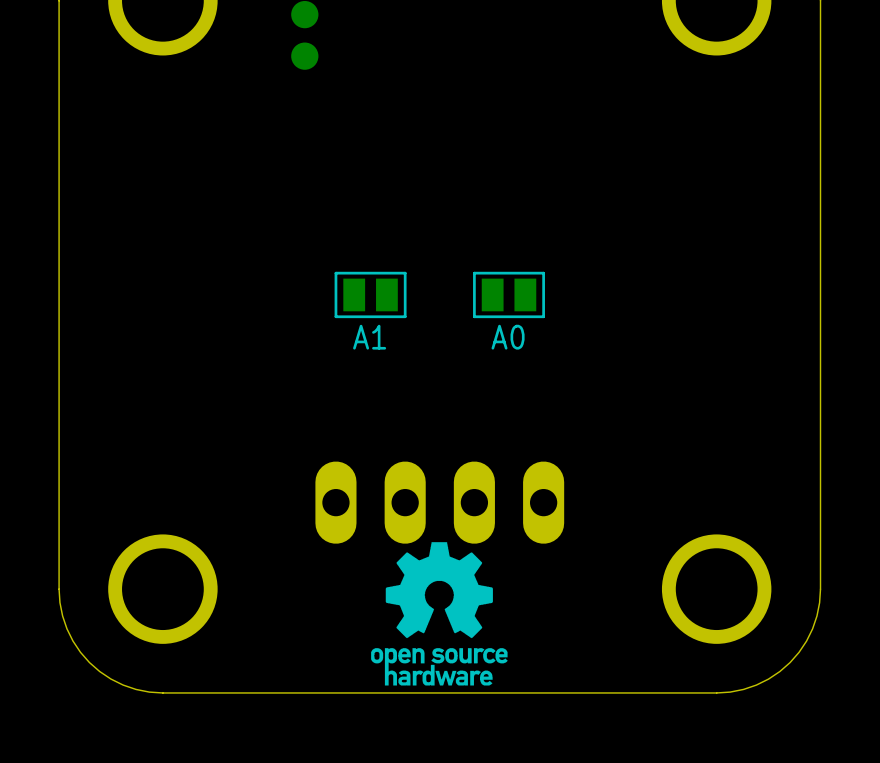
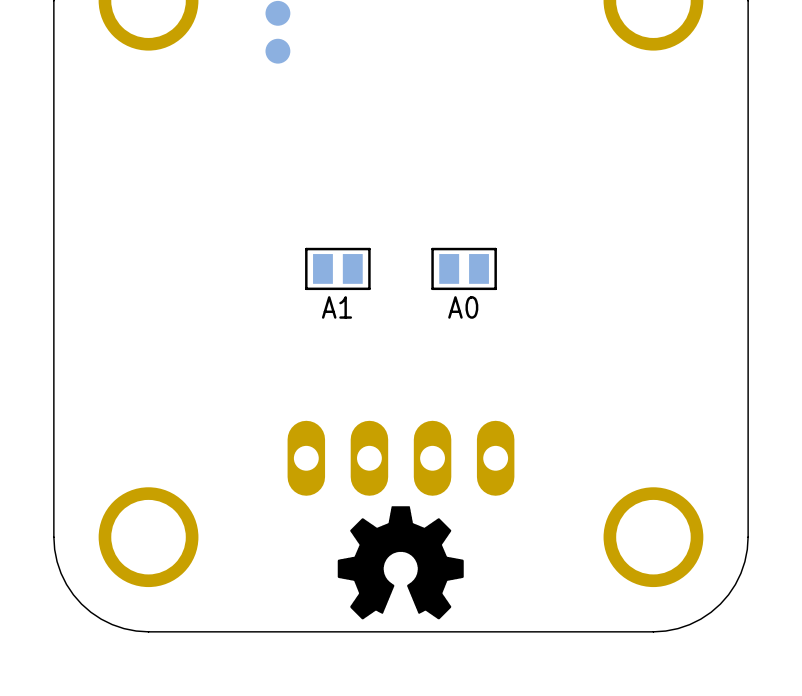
drawing shape: [371, 542, 508, 686] -> [337, 506, 464, 620]

